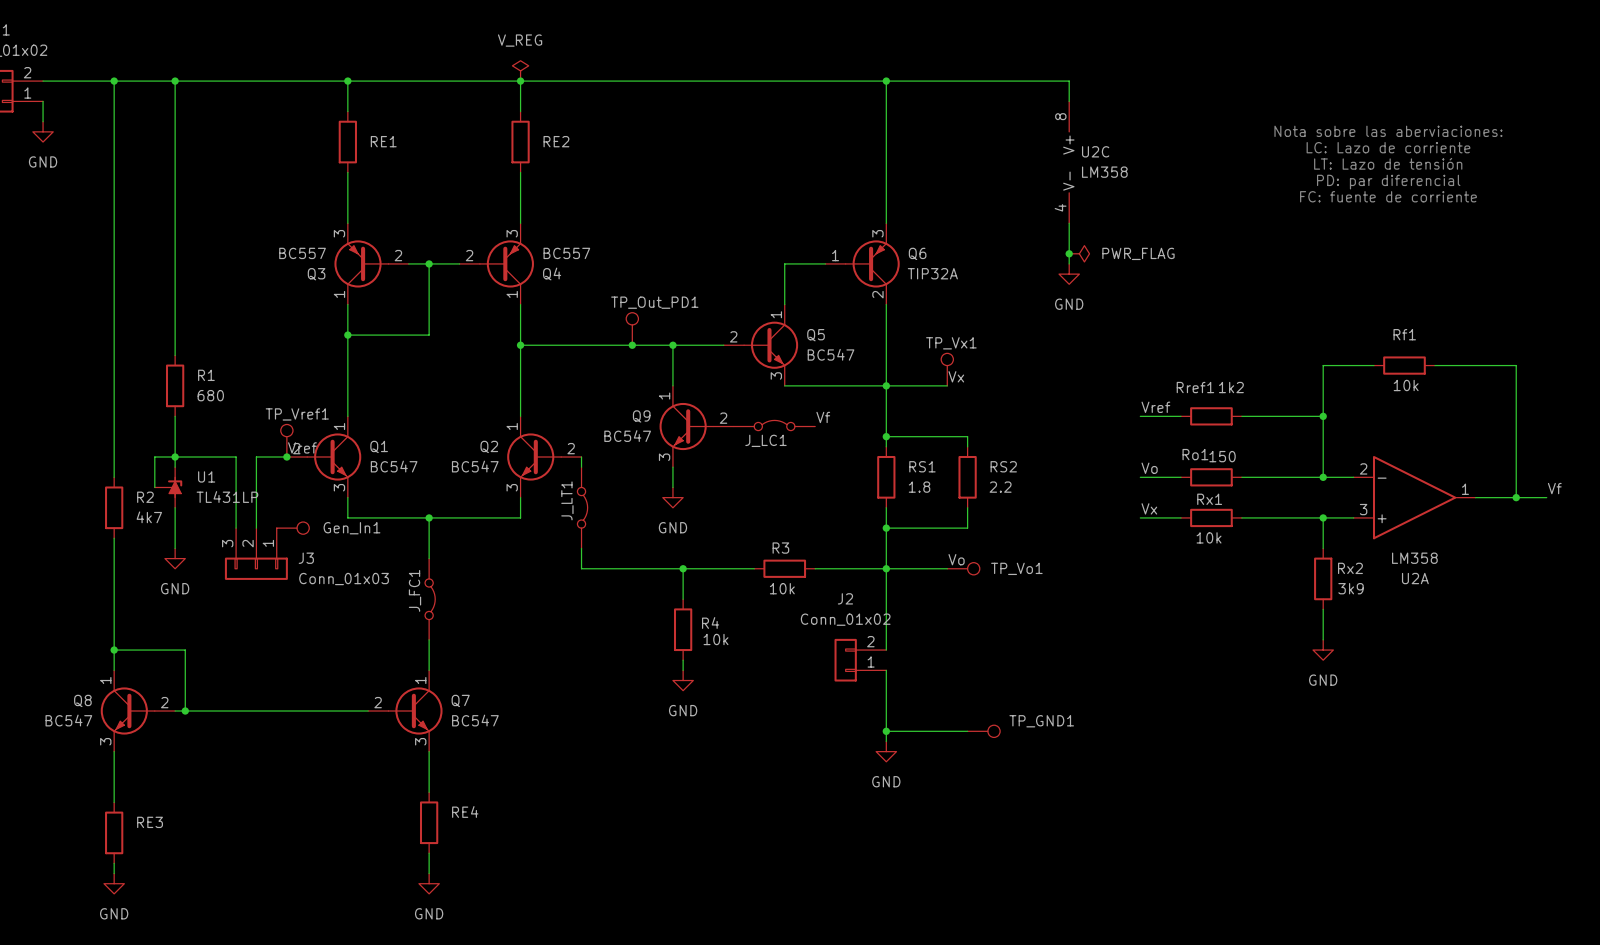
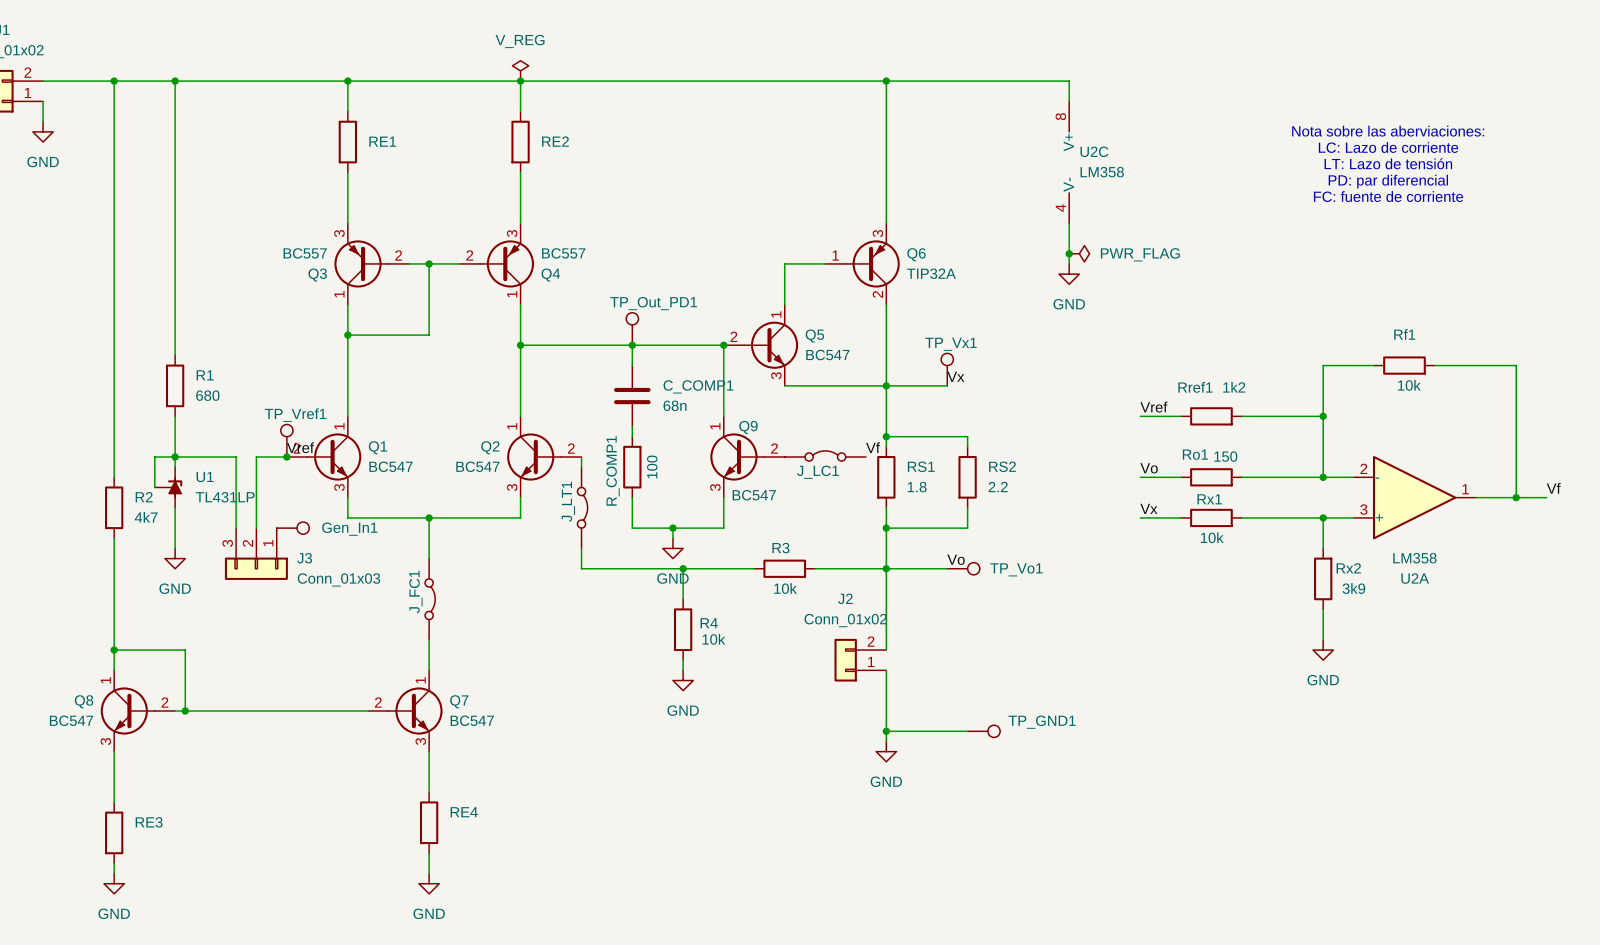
wire: (672, 345) (672, 385) -> none
junction: (672, 345) -> none
wire: none -> (723, 345) (723, 416)
junction: none -> (723, 345)
C_COMP1: none -> 68n (632, 396)
Q9 name position: Q9 (641, 416) -> Q9 (748, 427)
label position: Vf (823, 417) -> Vf (873, 447)
J_LC1 position: (774, 425) -> (825, 455)
wire: none -> (632, 426) (632, 436)
Q9 position: (696, 426) -> (747, 457)
Q9 value position: BC547 (627, 436) -> BC547 (754, 495)
R_COMP1: none -> 100 (632, 467)
wire: (672, 467) (672, 487) -> (632, 345) (632, 365)
wire: none -> (632, 497) (632, 528) (723, 528) (723, 497)
power symbol position: GND (672, 497) -> GND (672, 548)
wire: none -> (672, 528) (672, 538)
junction: none -> (672, 528)

